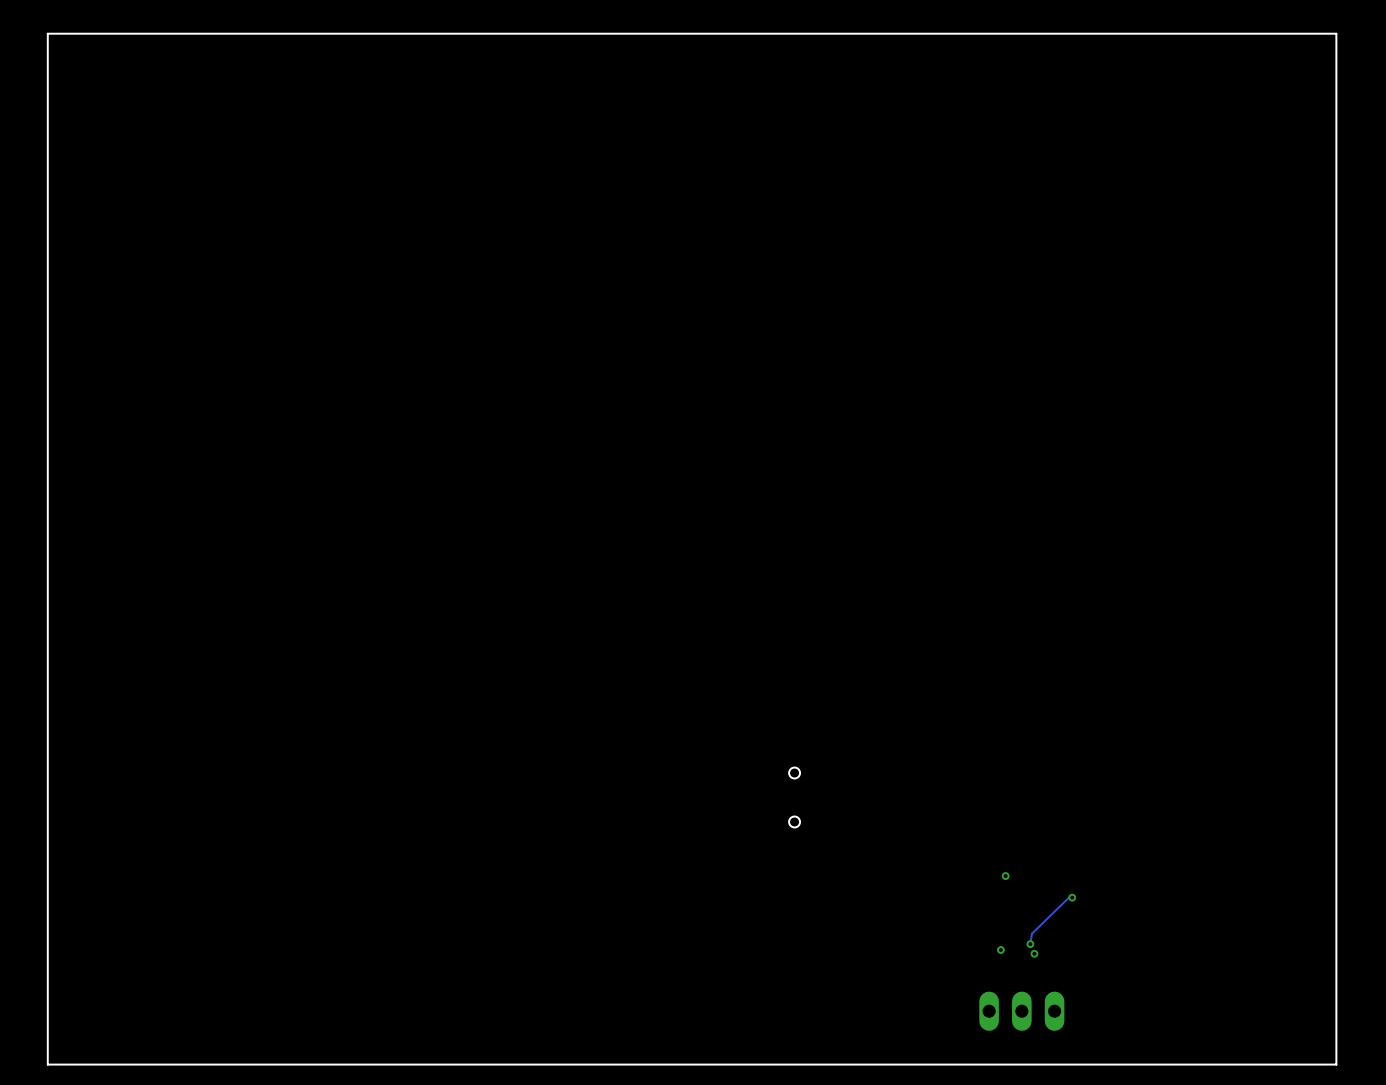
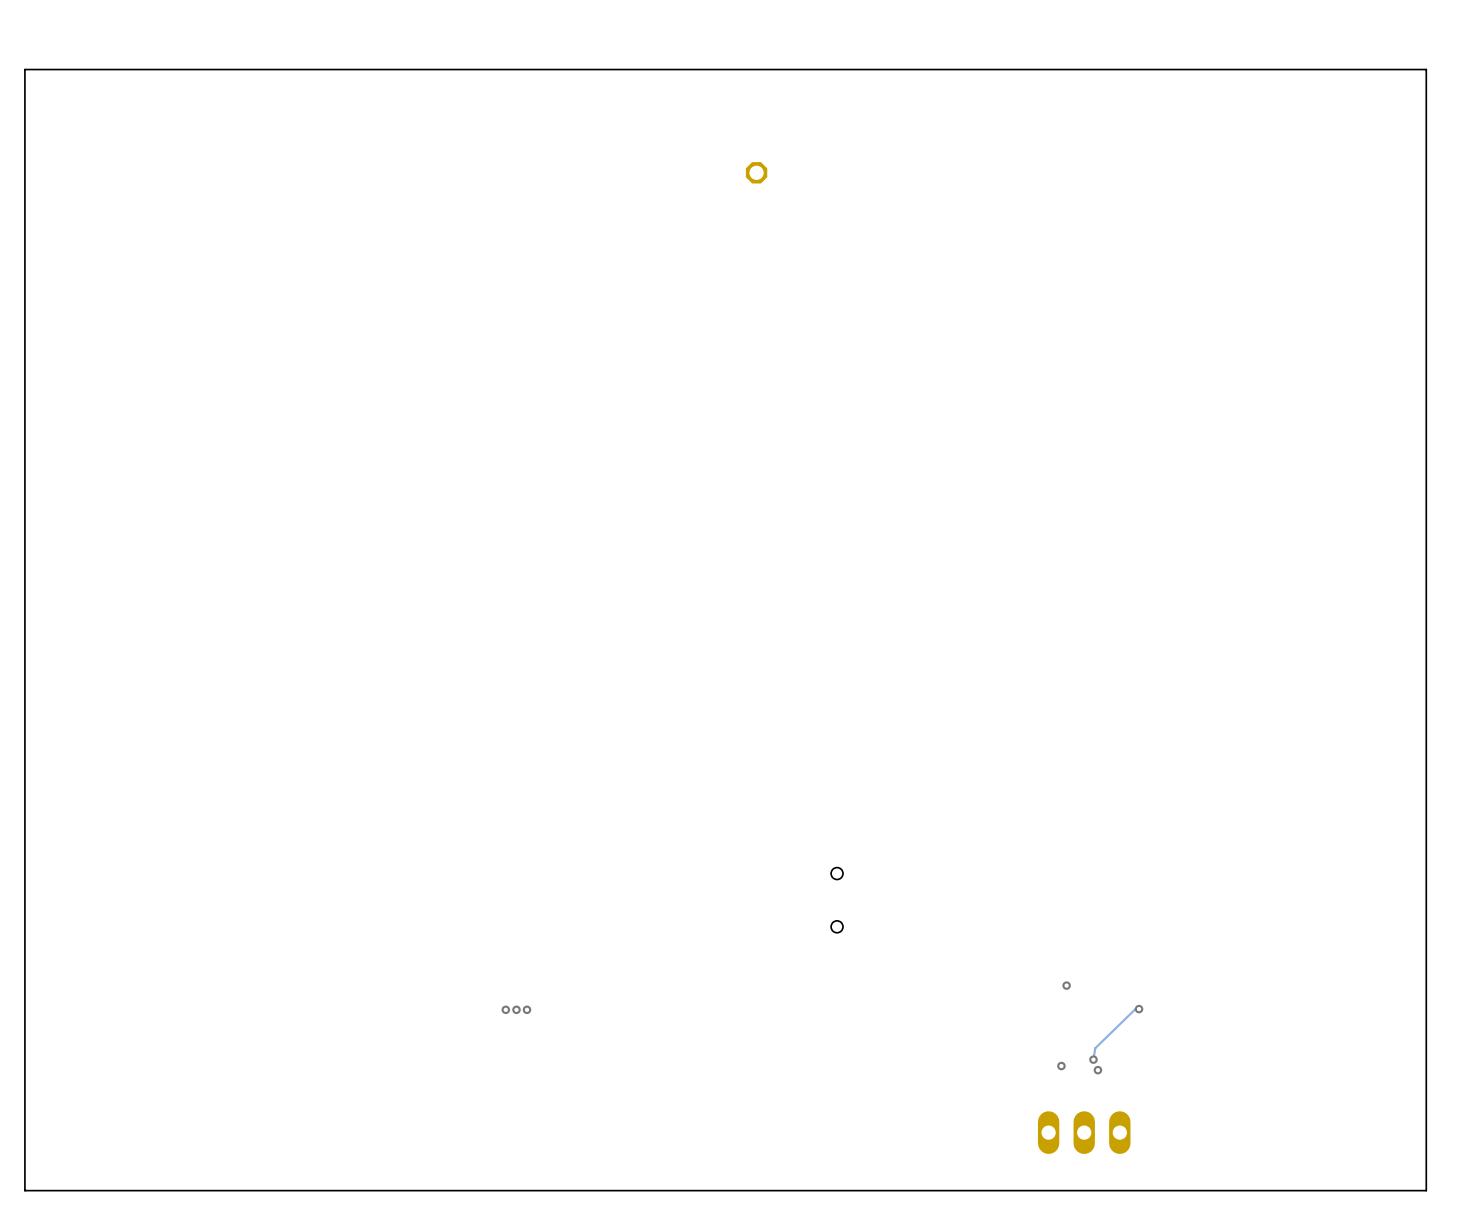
part: none -> (756, 172)
via: none -> (505, 1009)
via: none -> (516, 1009)
via: none -> (526, 1009)

